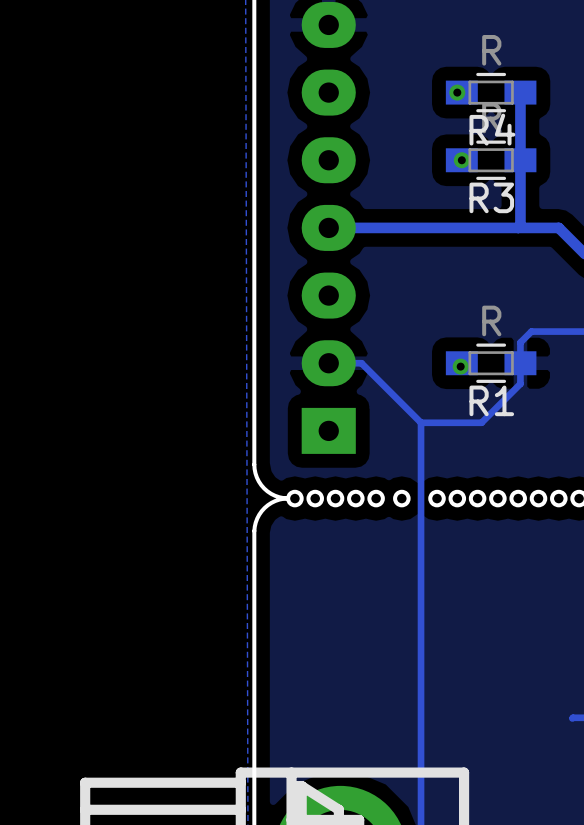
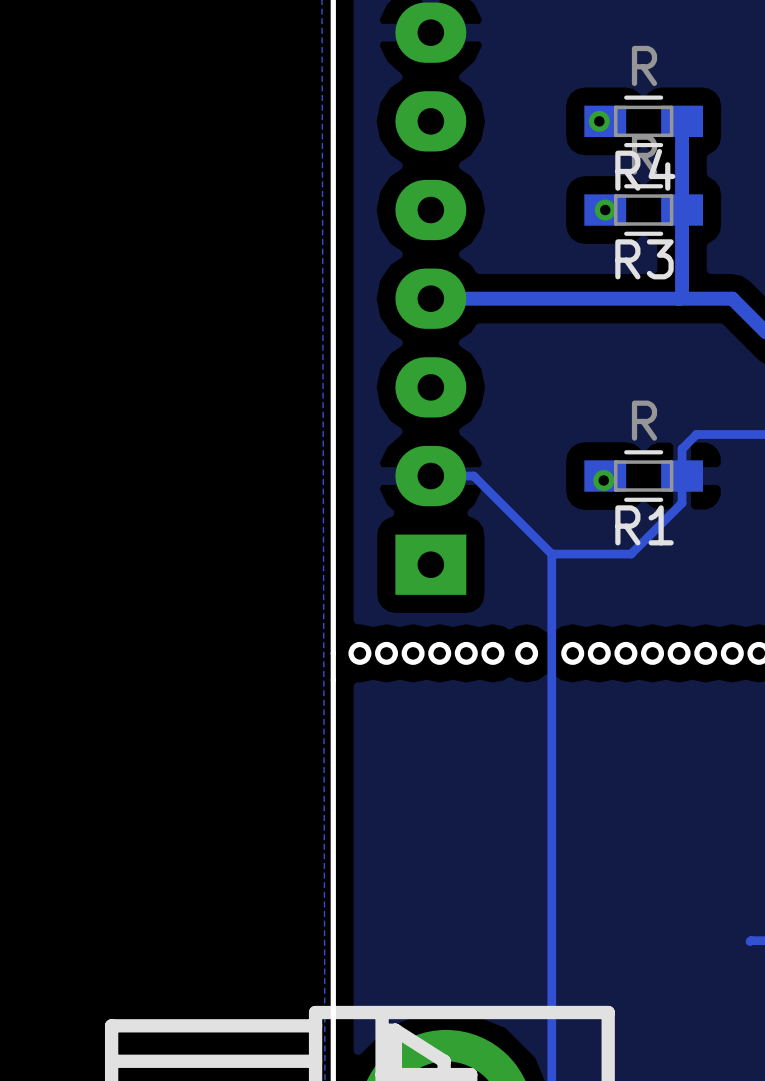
board edge: (254, 464) (256, 477) (264, 488) (275, 495) (288, 498) -> (333, 608) (333, 695)
round board edge: none -> [348, 641, 372, 665]
board edge: (287, 498) (275, 500) (264, 508) (257, 518) (254, 531) -> none

